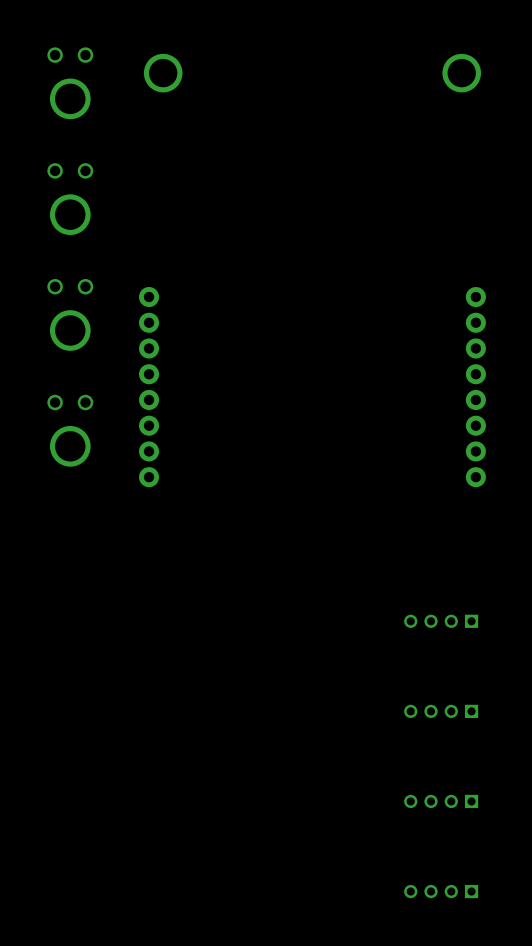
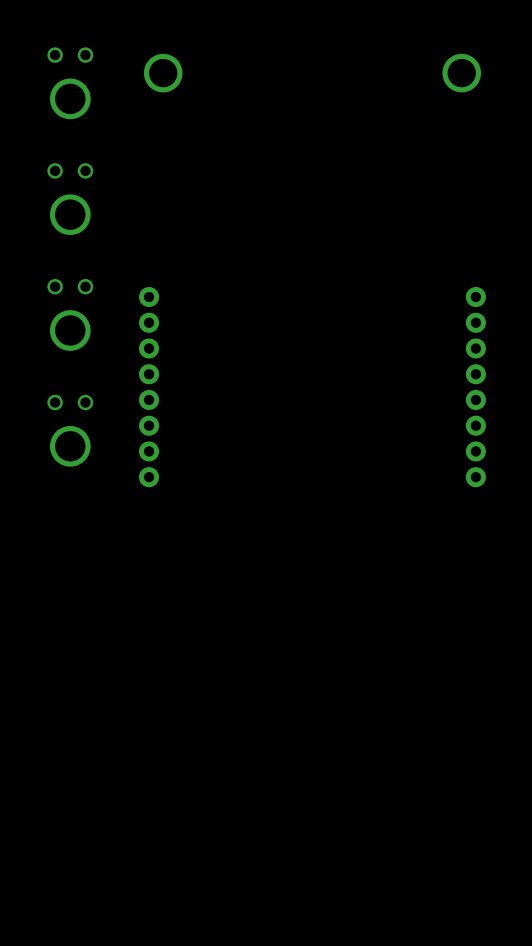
part: (441, 621) -> none
part: (441, 711) -> none
part: (441, 801) -> none
part: (441, 891) -> none

